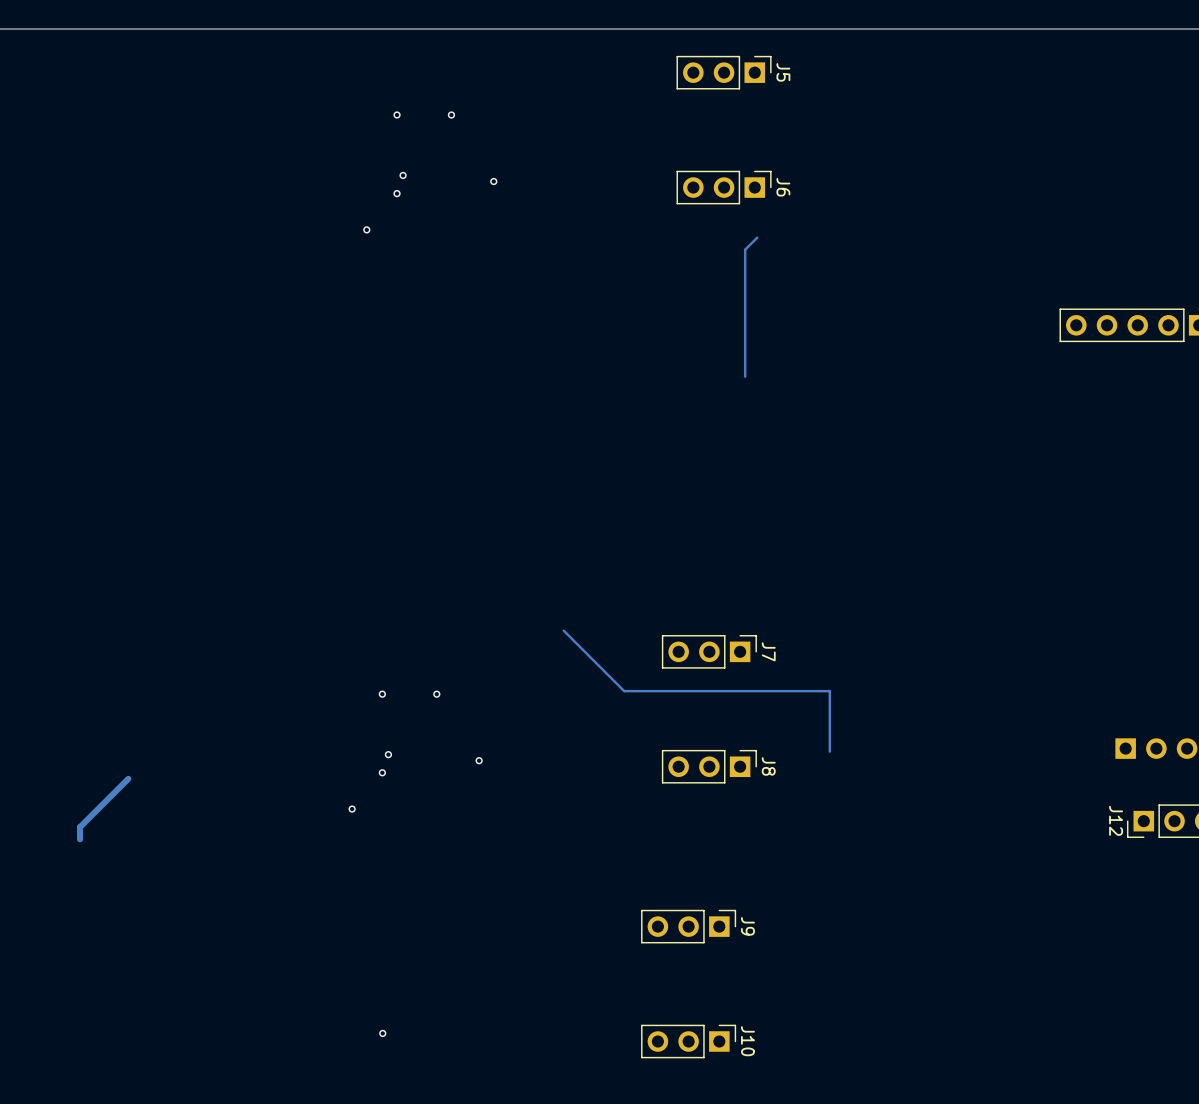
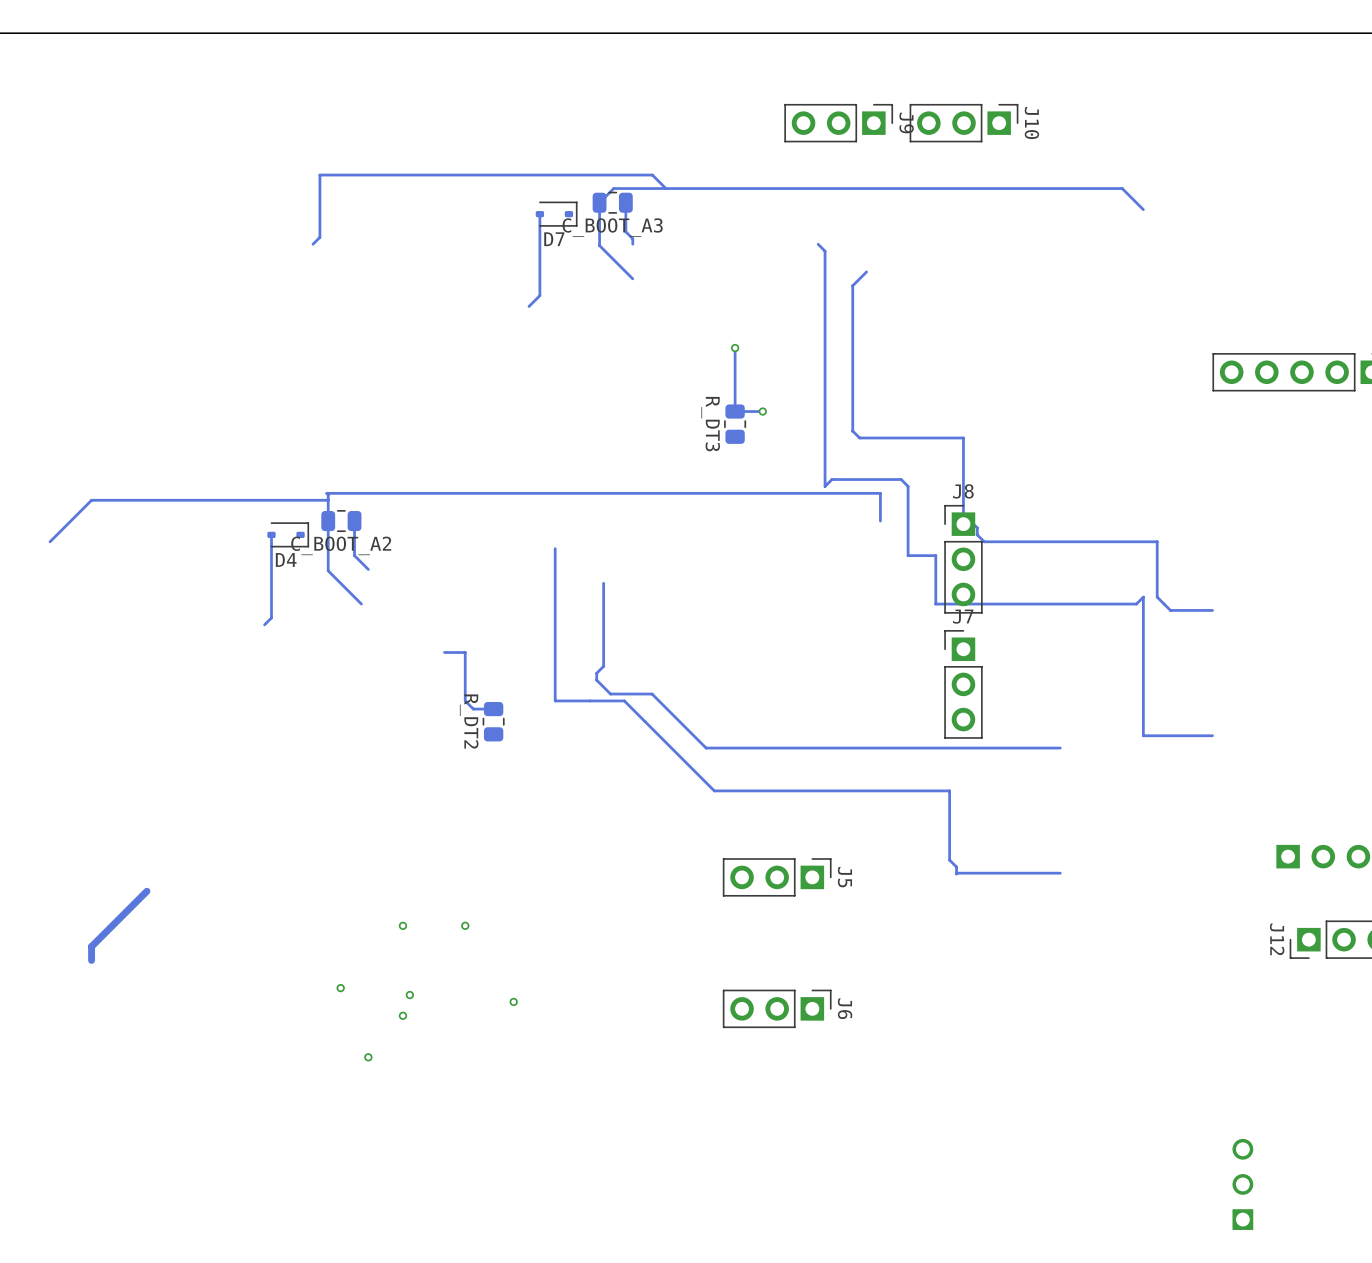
J5 position: (724, 72) -> (777, 877)
via: (397, 114) -> none
via: (451, 114) -> none
track: none -> (665, 188) (652, 175) (319, 175) (319, 237) (313, 244)
via: (403, 175) -> none
C_BOOT_A3: none -> (612, 202)
track: none -> (625, 202) (625, 231) (632, 238) (632, 244)
via: (493, 181) -> none
track: none -> (1143, 209) (1122, 188) (613, 188) (599, 202) (599, 245) (632, 278)
track: none -> (539, 214) (539, 295) (528, 306)
D7: none -> (556, 214)
J6 position: (724, 187) -> (777, 1008)
via: (397, 193) -> none
track: none -> (818, 244) (825, 251) (825, 486) (831, 479) (901, 479) (908, 486) (908, 555) (935, 555) (935, 604) (1136, 604) (1143, 597) (1143, 735) (1212, 735)
via: (366, 229) -> none
track: none -> (735, 348) (735, 411) (762, 411)
via: none -> (735, 348)
via: none -> (762, 411)
R_DT3: none -> (735, 424)
track: none -> (852, 431) (859, 438) (963, 438) (963, 514) (977, 527) (977, 534) (984, 541) (1157, 541) (1157, 597) (1170, 610) (1212, 610)
track: none -> (328, 500) (91, 500) (50, 541)
C_BOOT_A2: none -> (341, 521)
track: none -> (354, 521) (354, 555) (368, 569)
track: none -> (880, 521) (880, 493) (326, 493) (328, 570) (361, 604)
track: none -> (271, 534) (271, 617) (264, 624)
D4: none -> (288, 534)
track: none -> (555, 548) (555, 700) (624, 700) (645, 721)
track: none -> (603, 583) (603, 666) (596, 673) (596, 680) (610, 694) (652, 694) (706, 748) (1060, 748)
track: none -> (444, 652) (465, 652) (465, 700) (473, 709) (493, 709)
R_DT2: none -> (493, 721)
J7 rotation: 0° (709, 651) -> 90° counterclockwise (963, 684)
J7 position: (709, 651) -> (963, 684)
via: (382, 694) -> none
via: (436, 694) -> none
track: none -> (949, 860) (956, 867) (956, 873) (1060, 873)
via: (388, 754) -> none
via: (479, 760) -> none
J8 rotation: 0° (709, 766) -> 90° counterclockwise (963, 559)
J8 position: (709, 766) -> (963, 559)
via: (382, 772) -> none
via: none -> (465, 925)
via: none -> (340, 988)
via: none -> (409, 995)
via: none -> (513, 1001)
via: none -> (402, 1015)
via: none -> (368, 1057)
J9 position: (688, 926) -> (838, 123)
via: (382, 1033) -> none
part: none -> (1242, 1184)
J10 position: (688, 1041) -> (964, 123)

